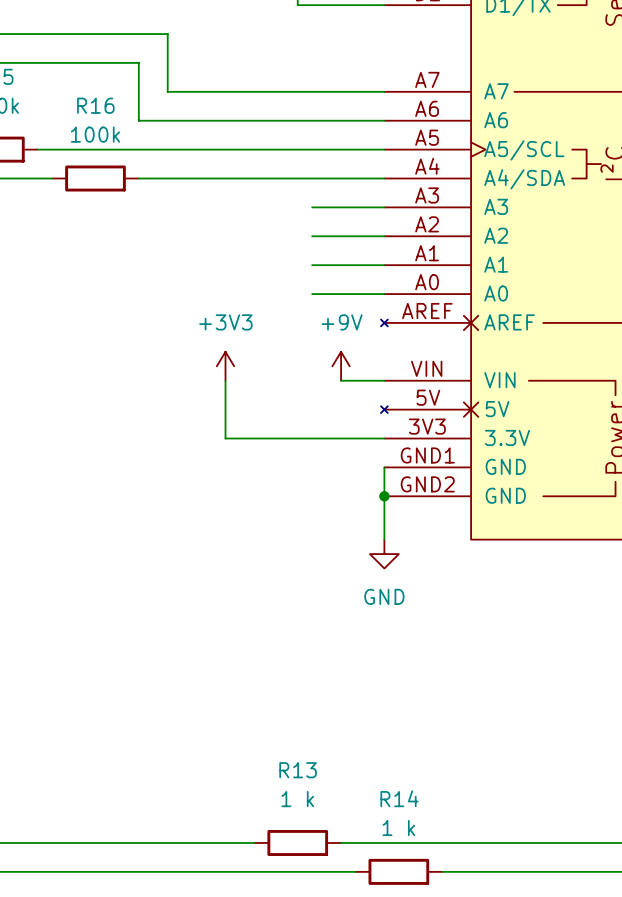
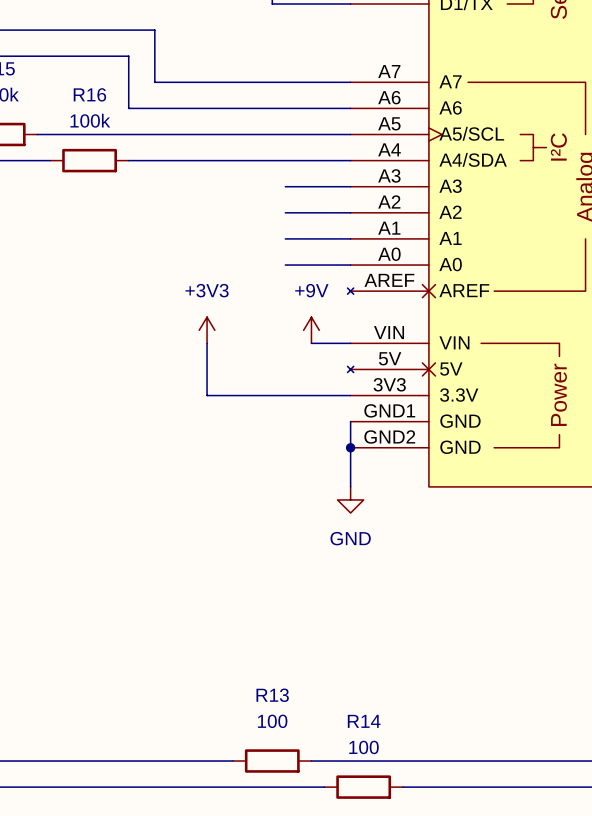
R13 value: 1 k (297, 799) -> 100 (272, 721)
R14 value: 1 k (398, 827) -> 100 (364, 747)

